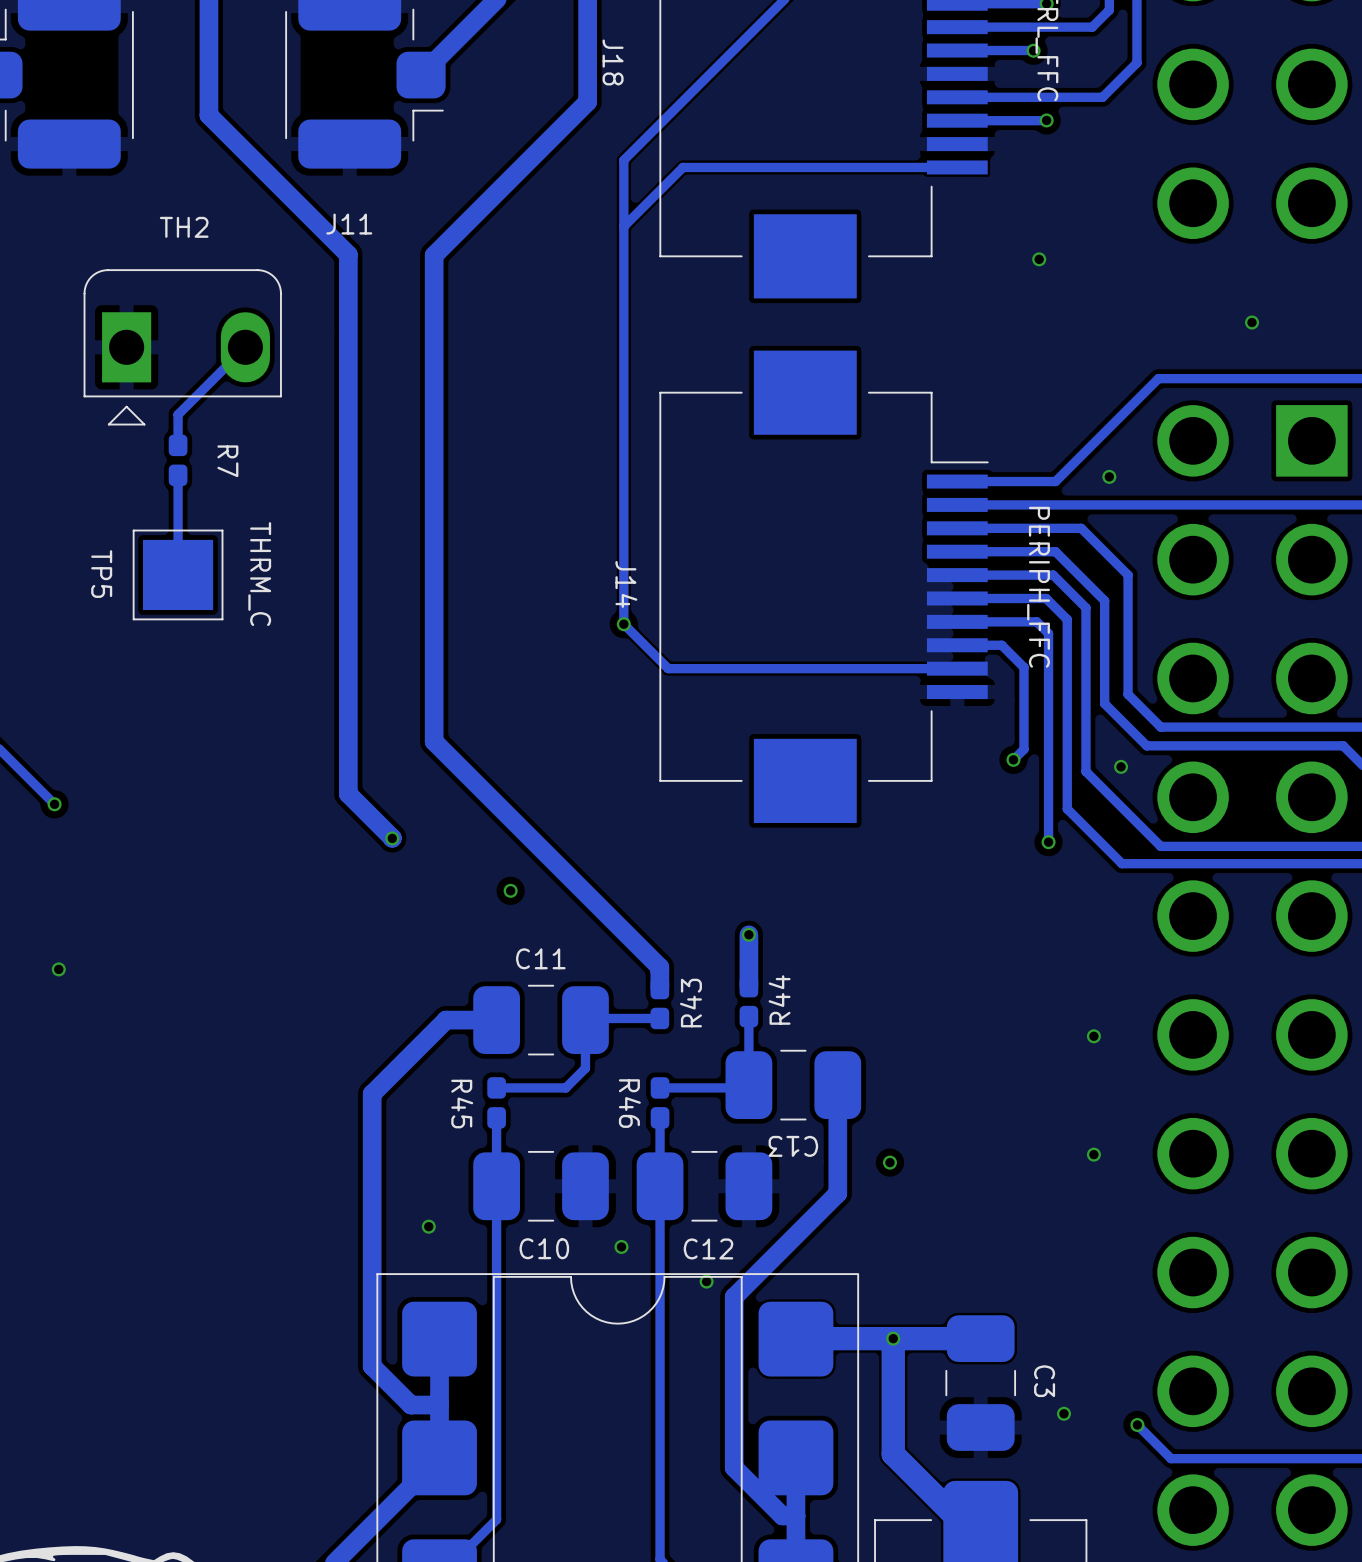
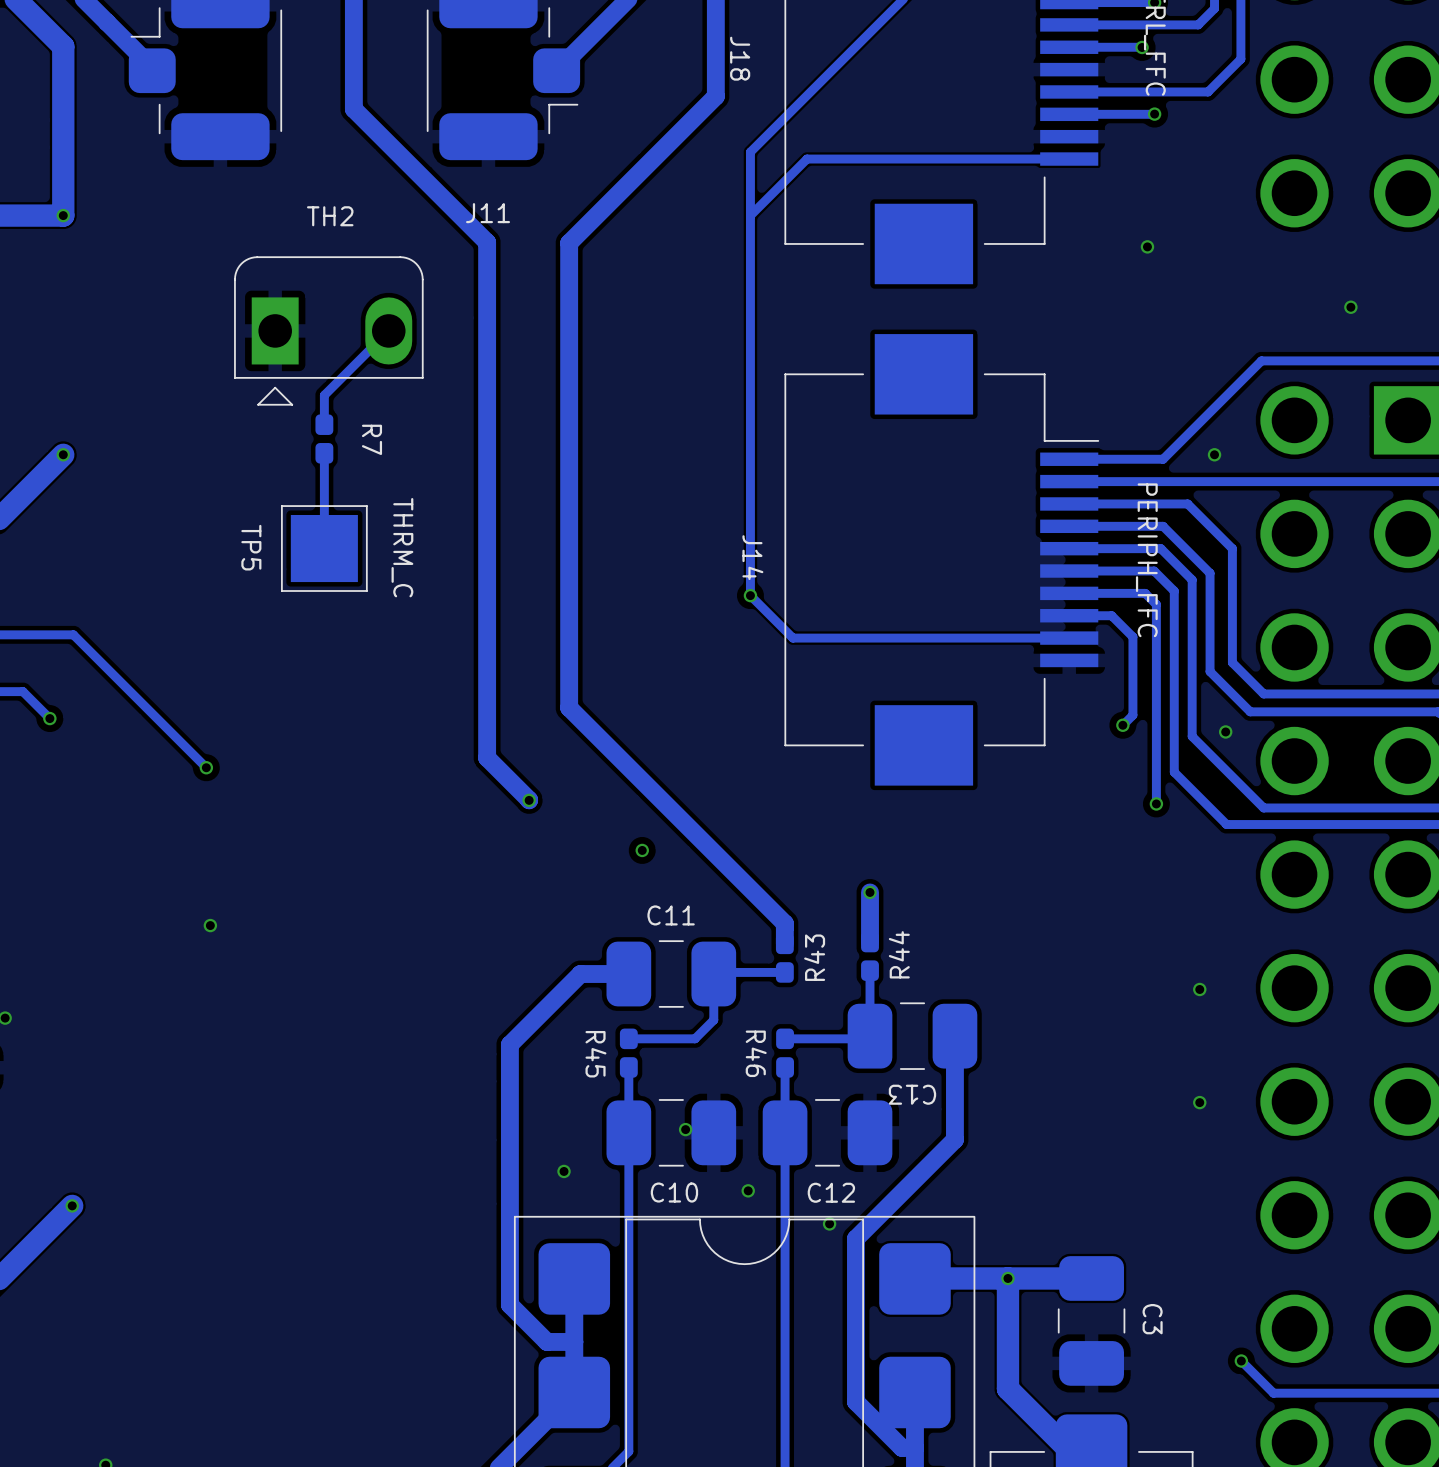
via: (889, 1162) -> none
via: none -> (685, 1129)
via: (1063, 1413) -> none

